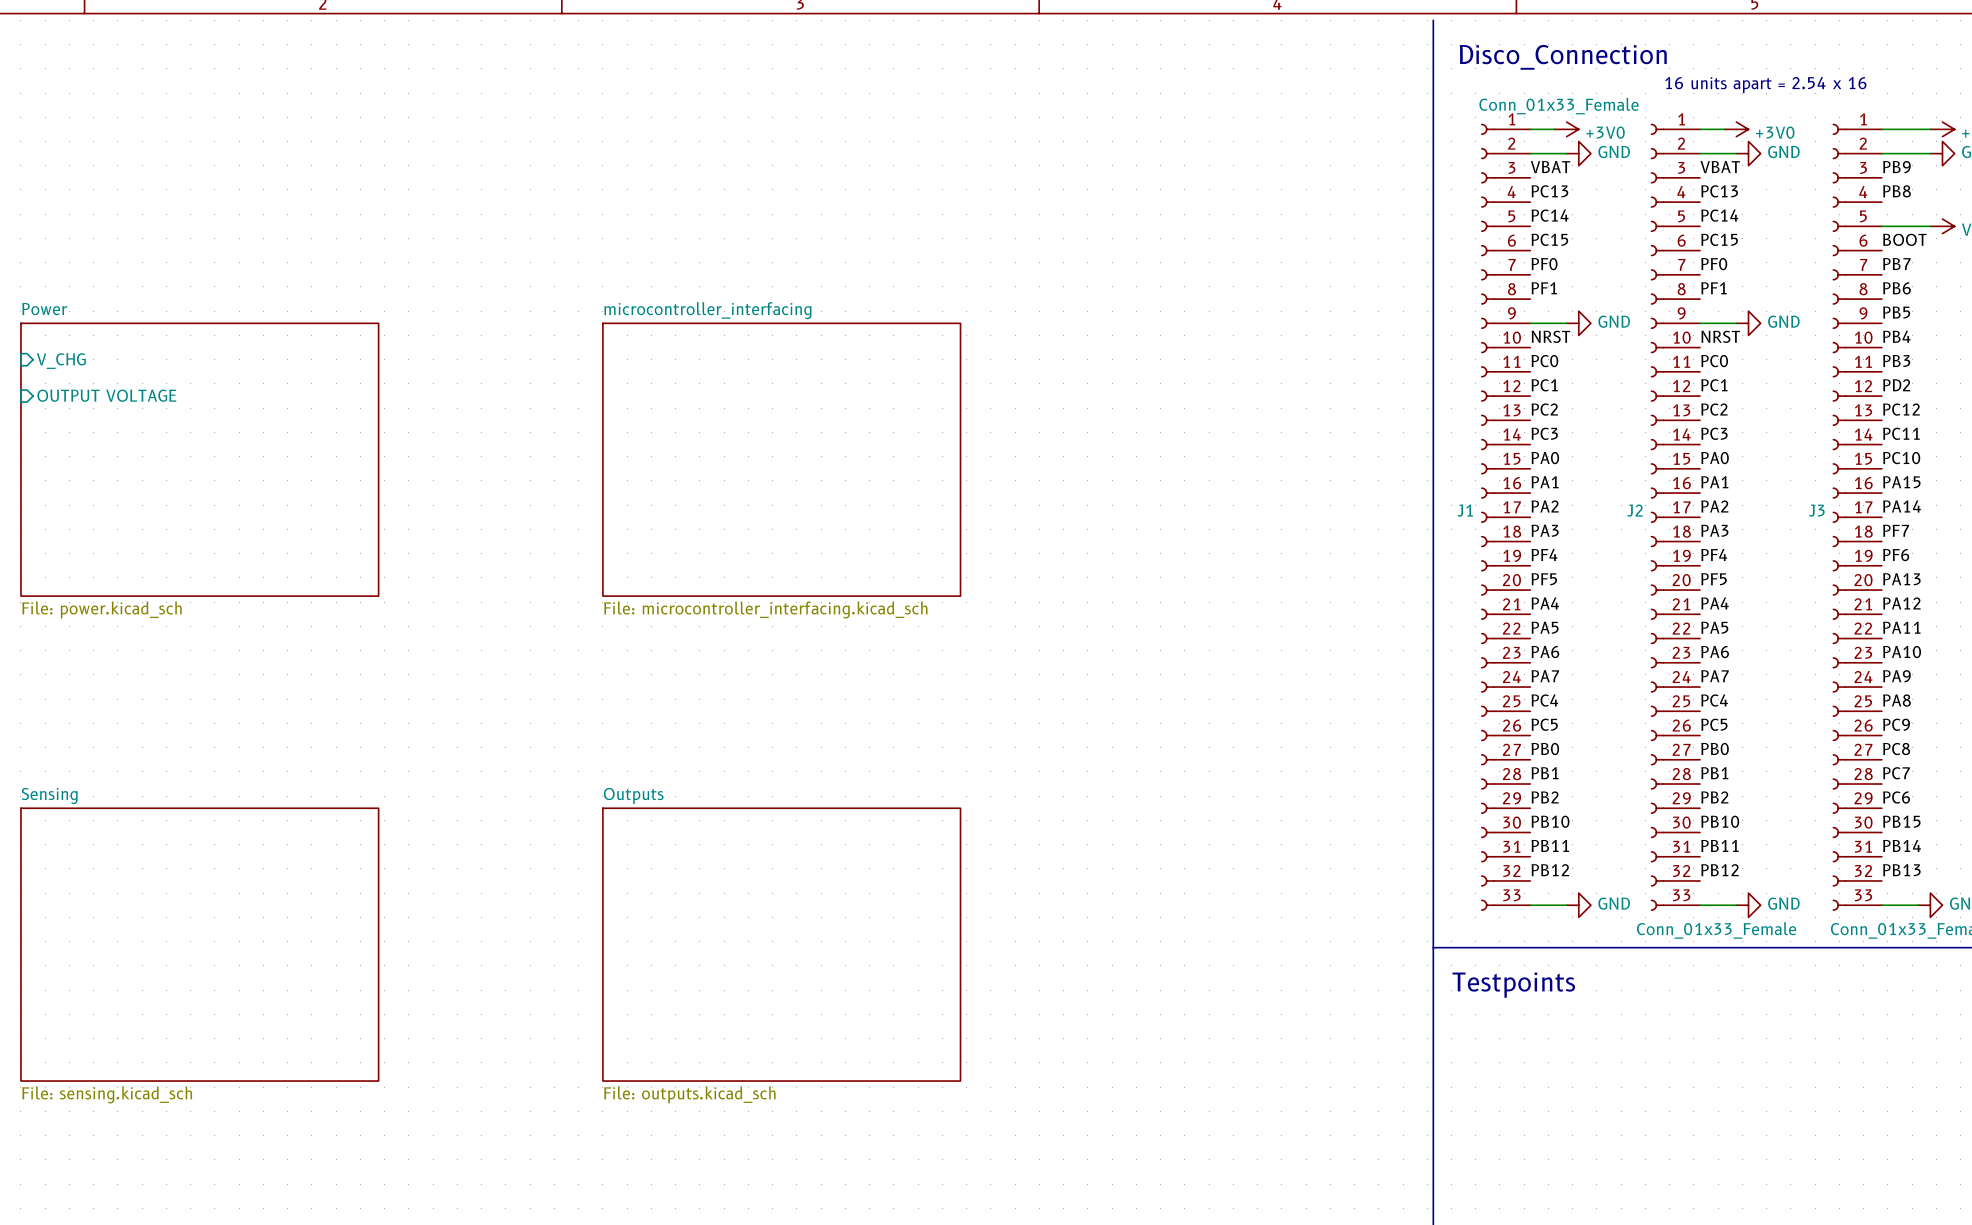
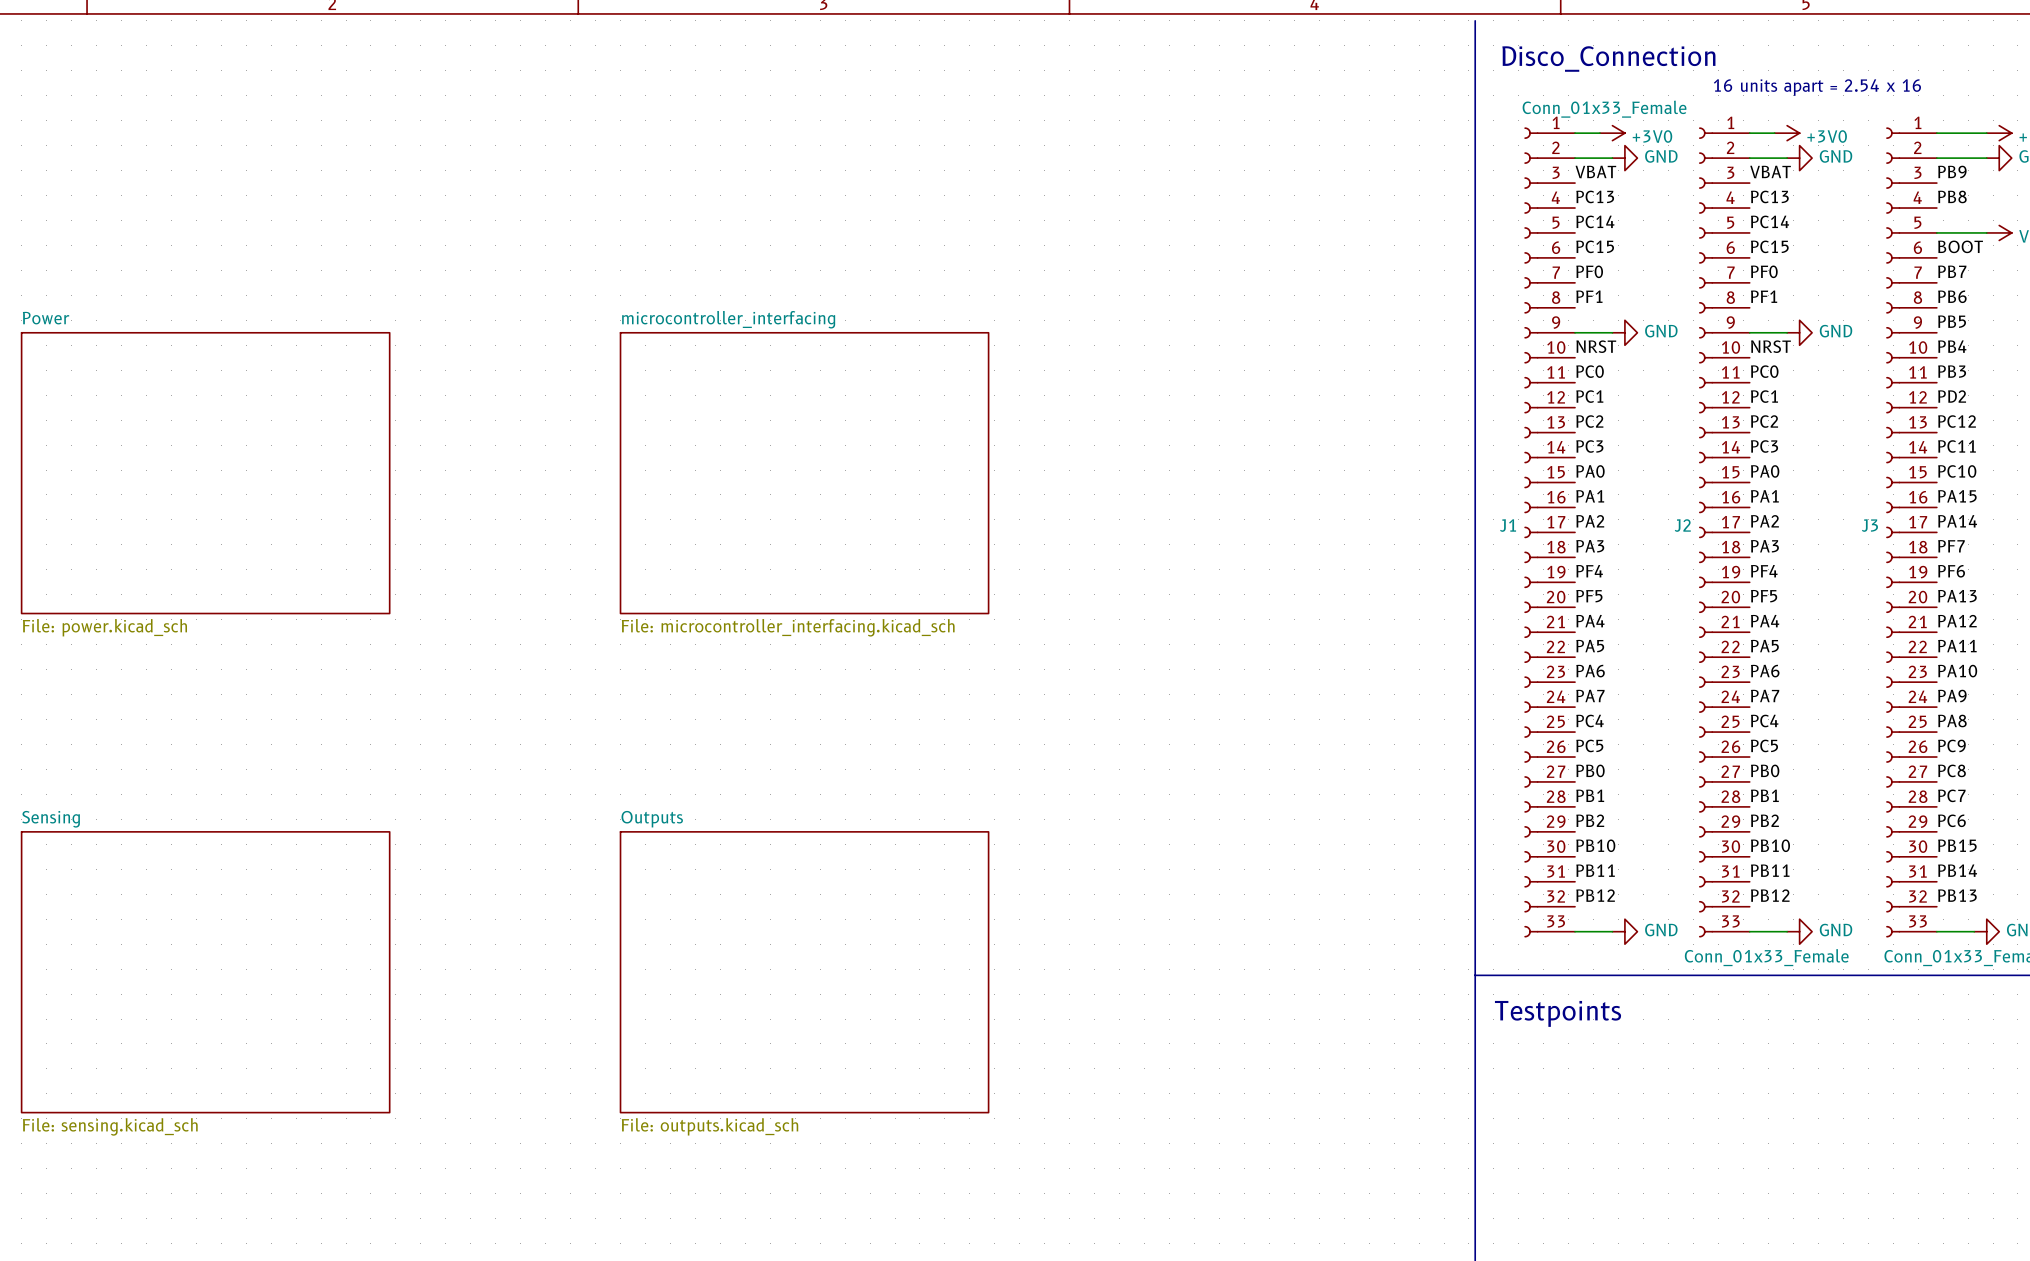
sheet pin: V_CHG (61, 361) -> none
sheet pin: OUTPUT VOLTAGE (106, 395) -> none

